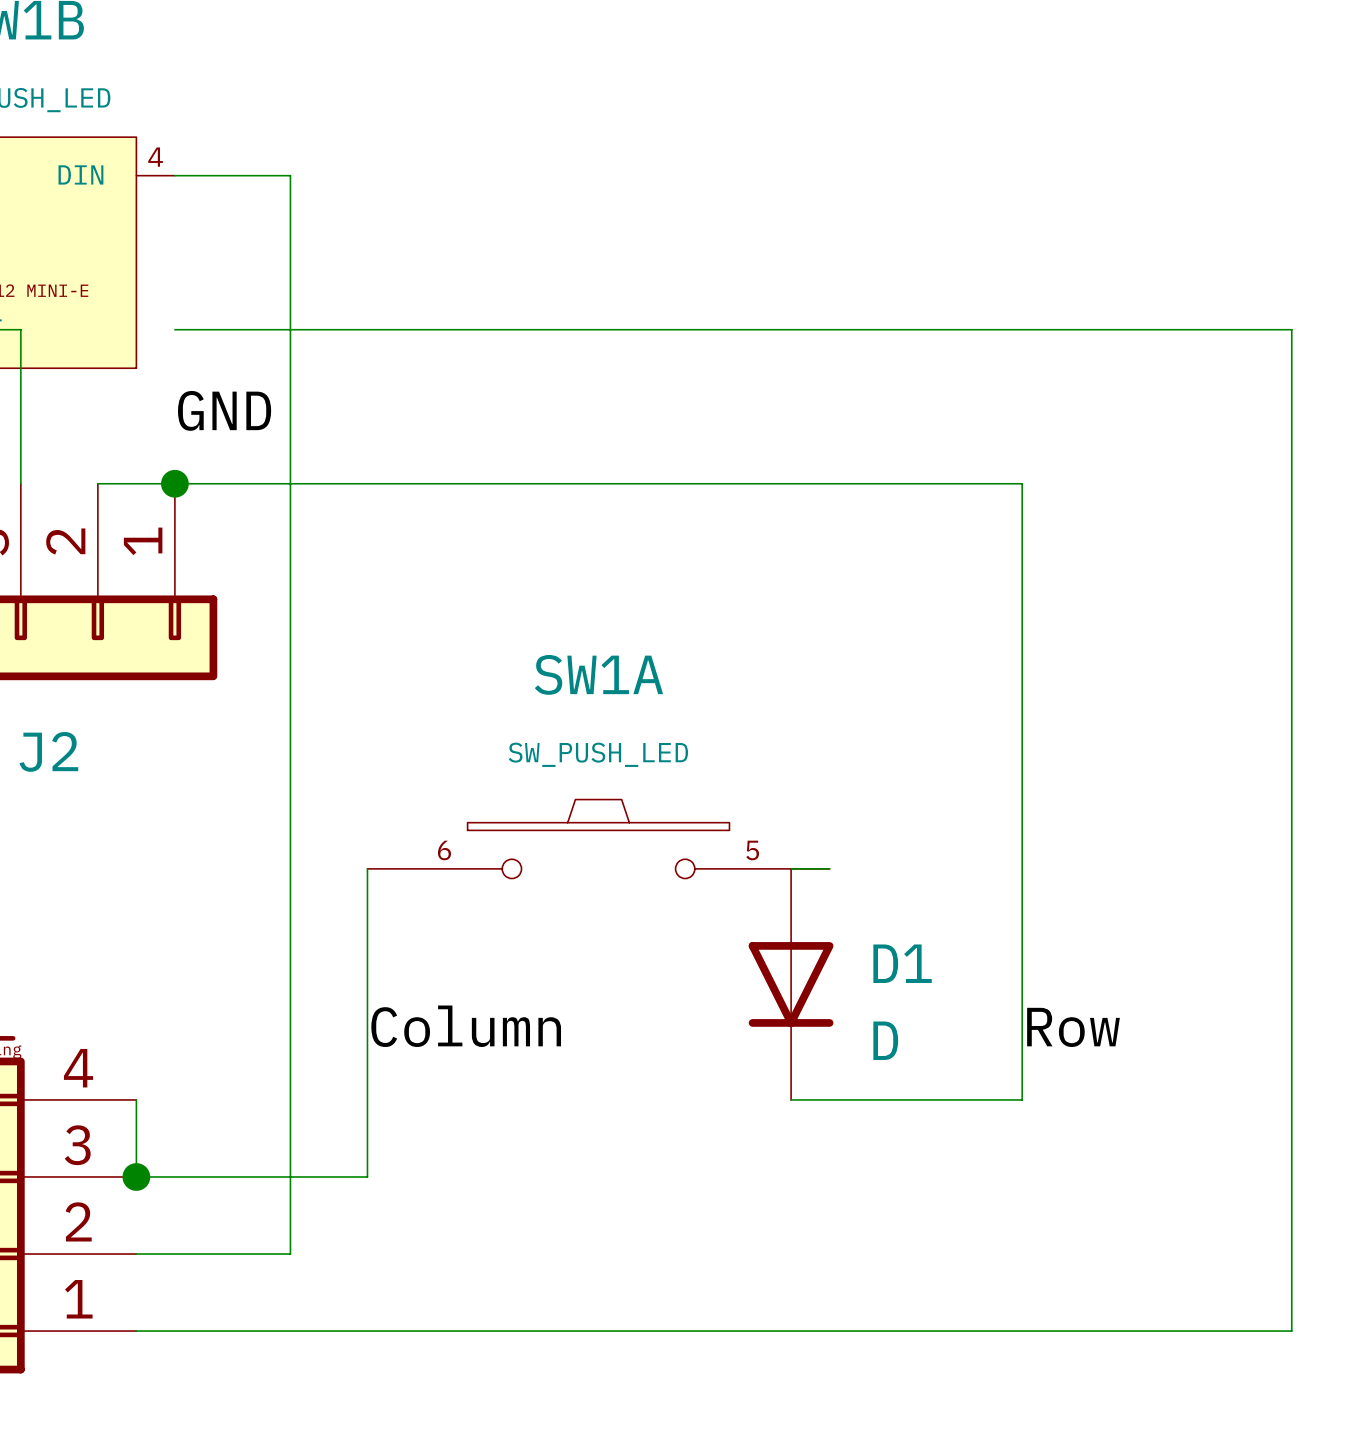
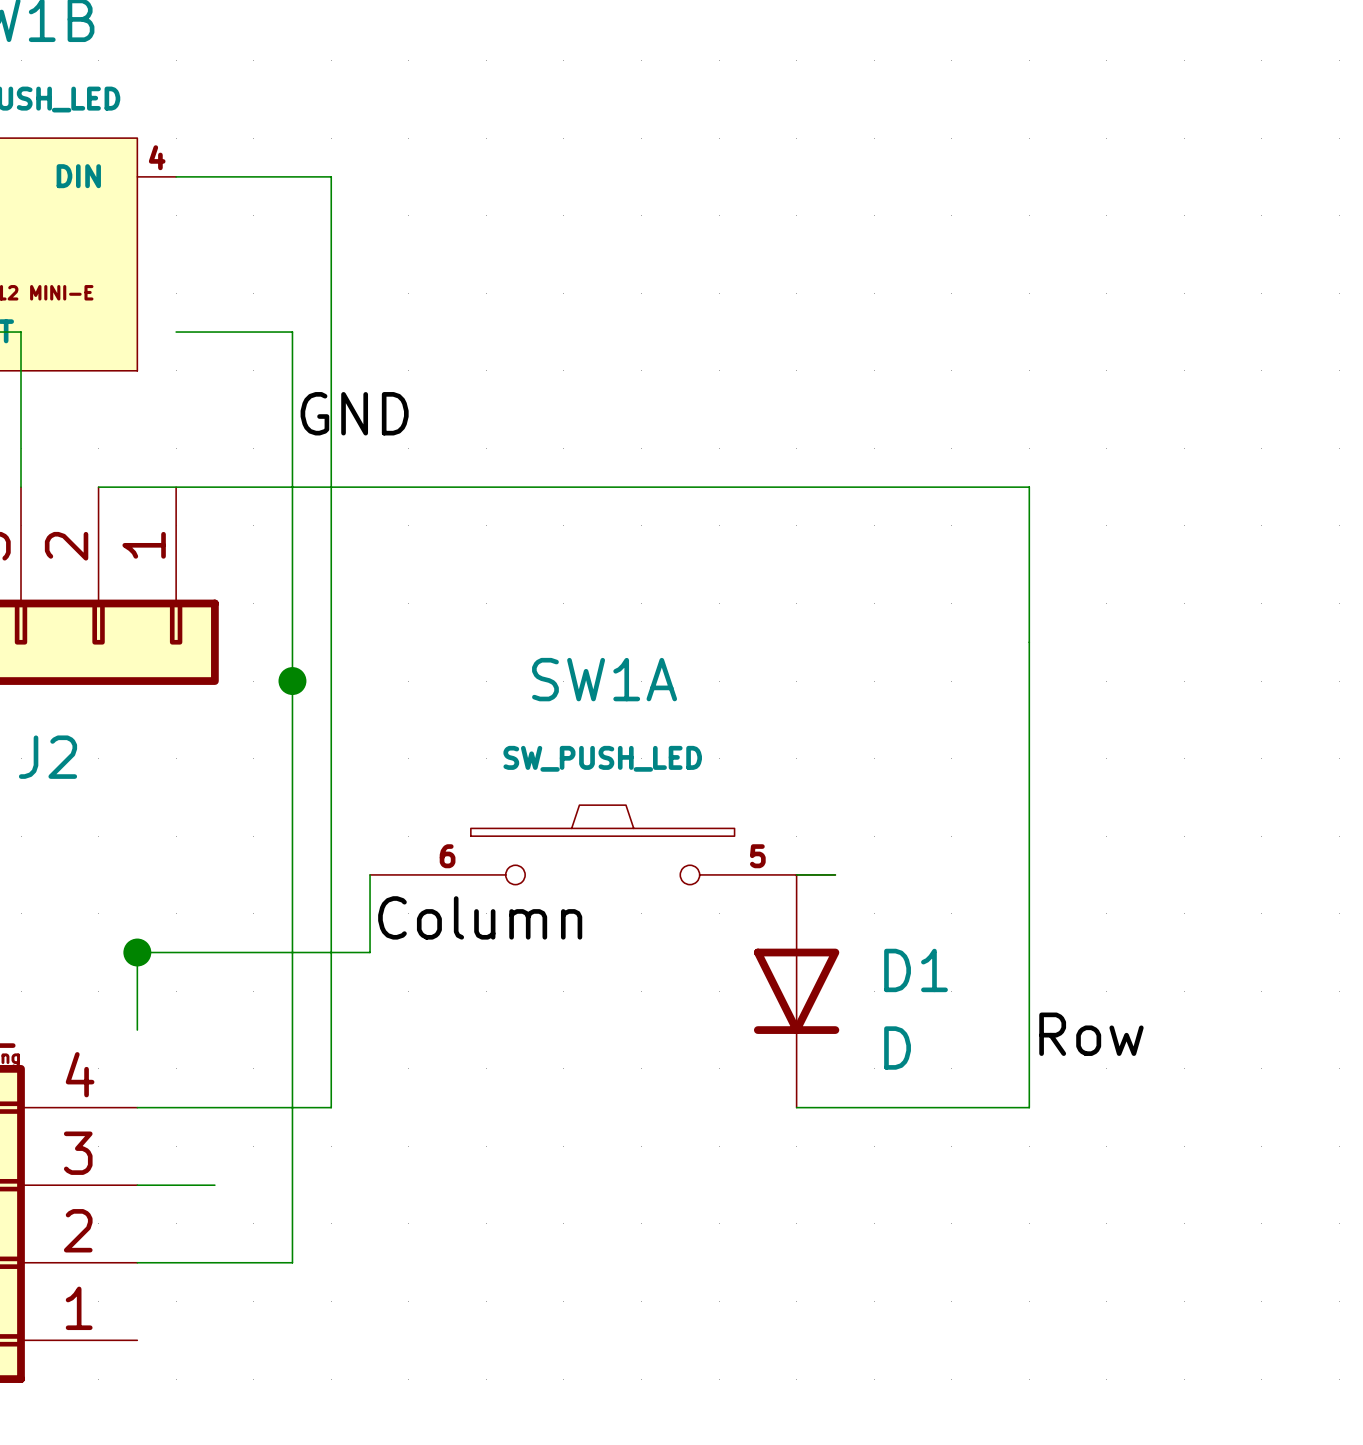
wire: (290, 175) (290, 329) (1291, 329) (1291, 1331) (136, 1331) -> (292, 176) (331, 176) (331, 1107) (137, 1107)
label position: GND (224, 410) -> GND (354, 413)
junction: (174, 483) -> none
junction: none -> (292, 681)
junction: none -> (137, 952)
wire: (367, 945) (367, 1176) (213, 1176) -> (370, 952) (137, 952) (137, 1030)
label position: Column (466, 1026) -> Column (480, 917)
wire: (136, 1099) (136, 1176) -> none
junction: (136, 1176) -> none

